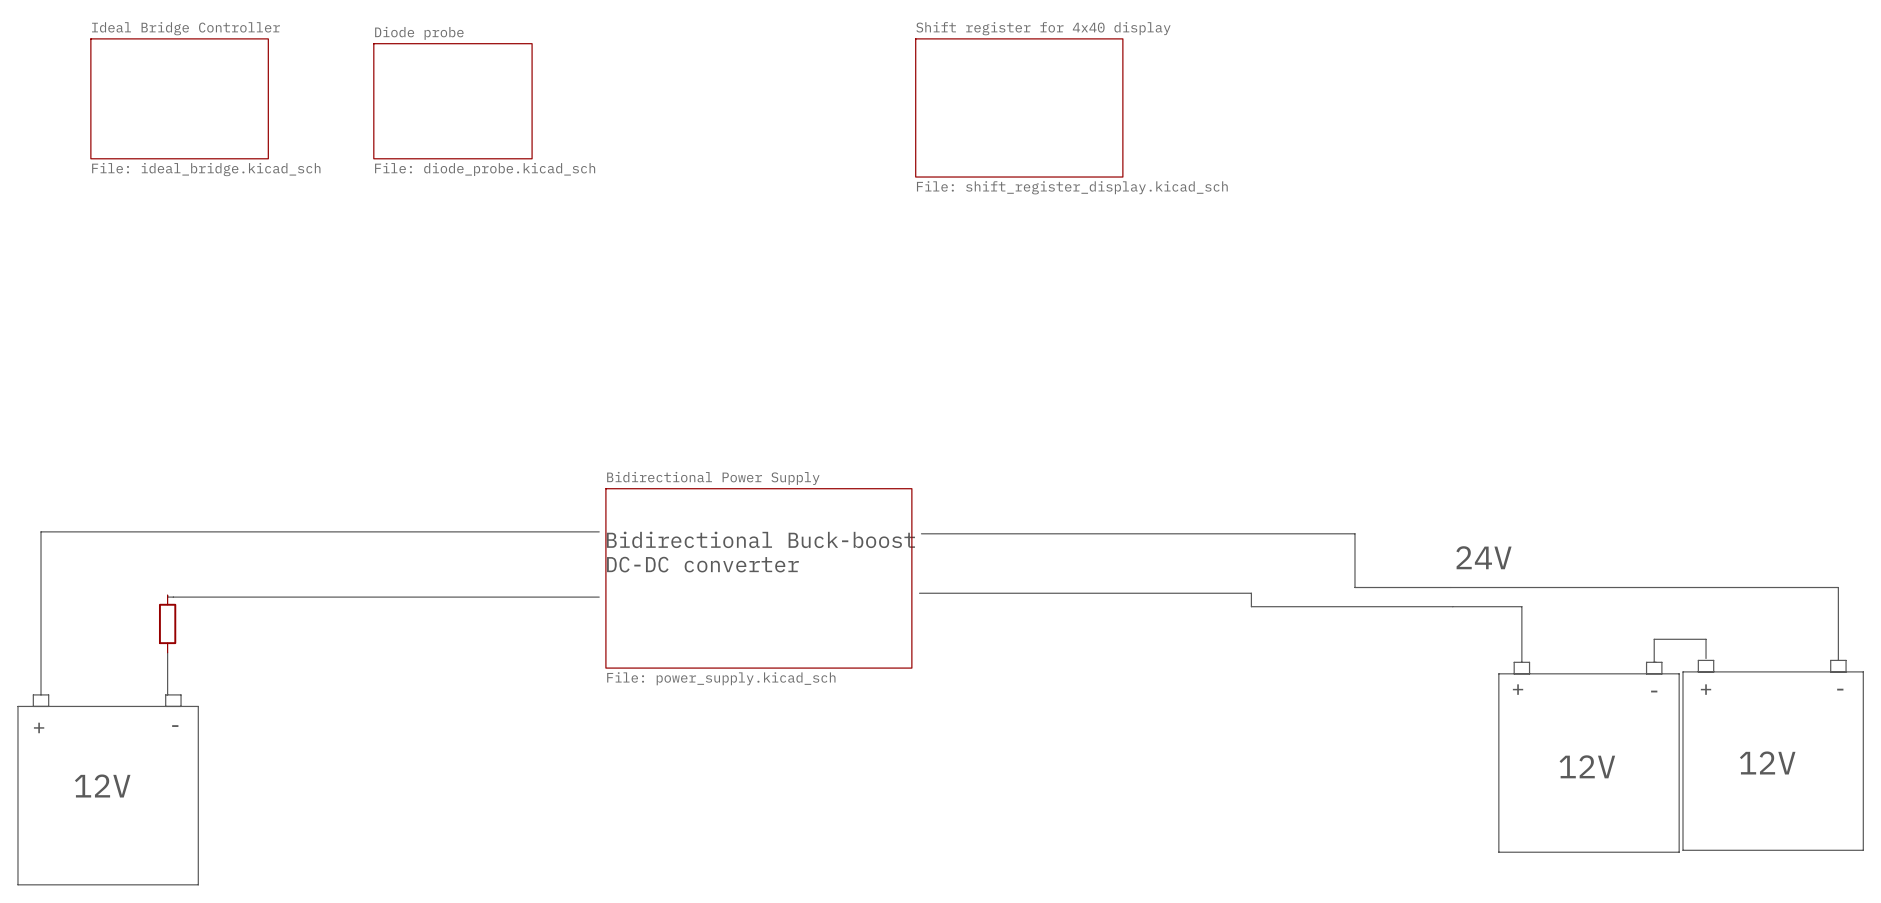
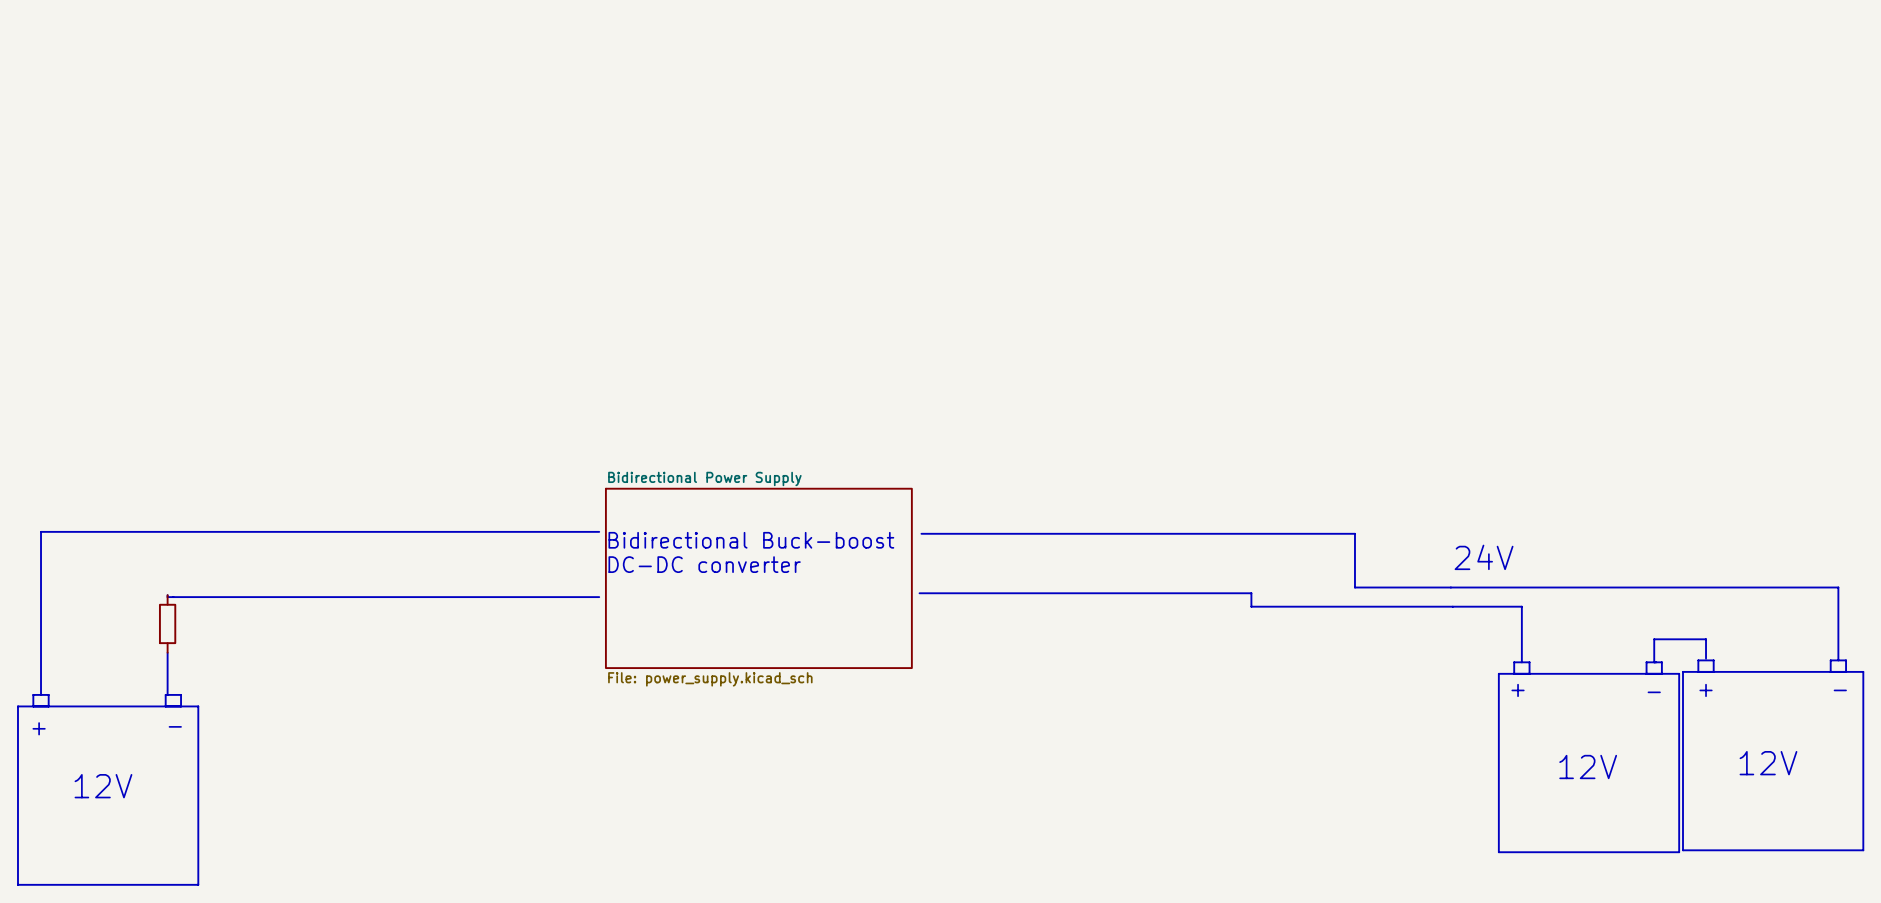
sheet Ideal Bridge Controller: File: ideal_bridge.kicad_sch (179, 98) -> none
sheet Diode probe: File: diode_probe.kicad_sch (452, 101) -> none
sheet Shift register for 4x40 display: File: shift_register_display.kicad_sch (1019, 107) -> none

